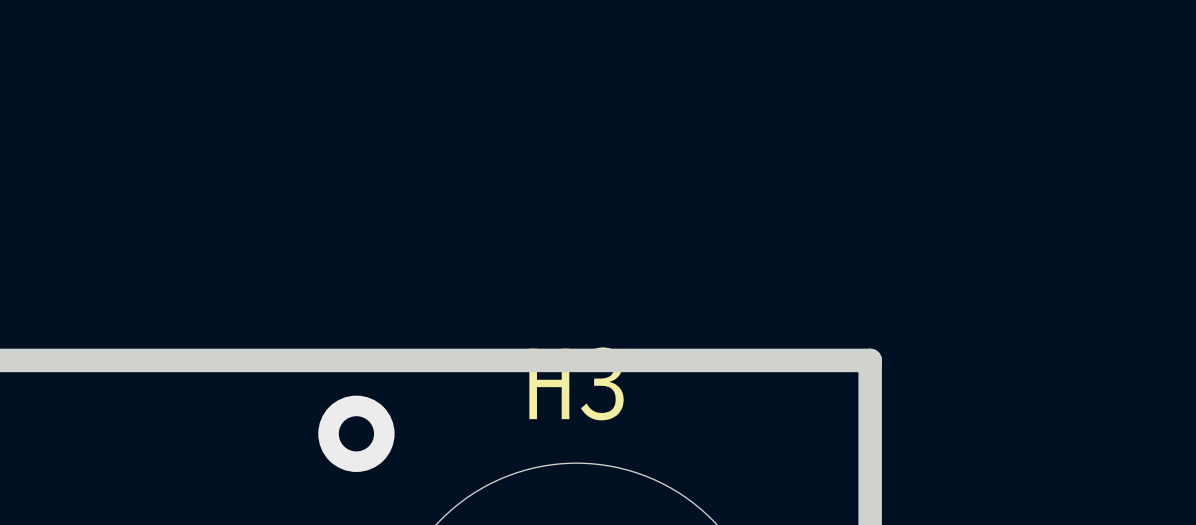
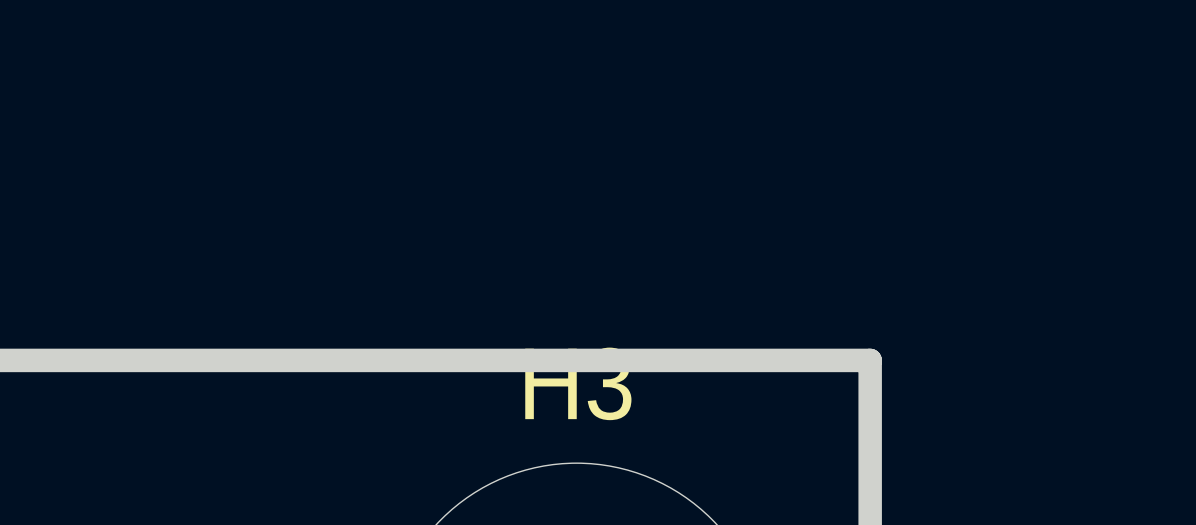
via: (356, 433) -> none

